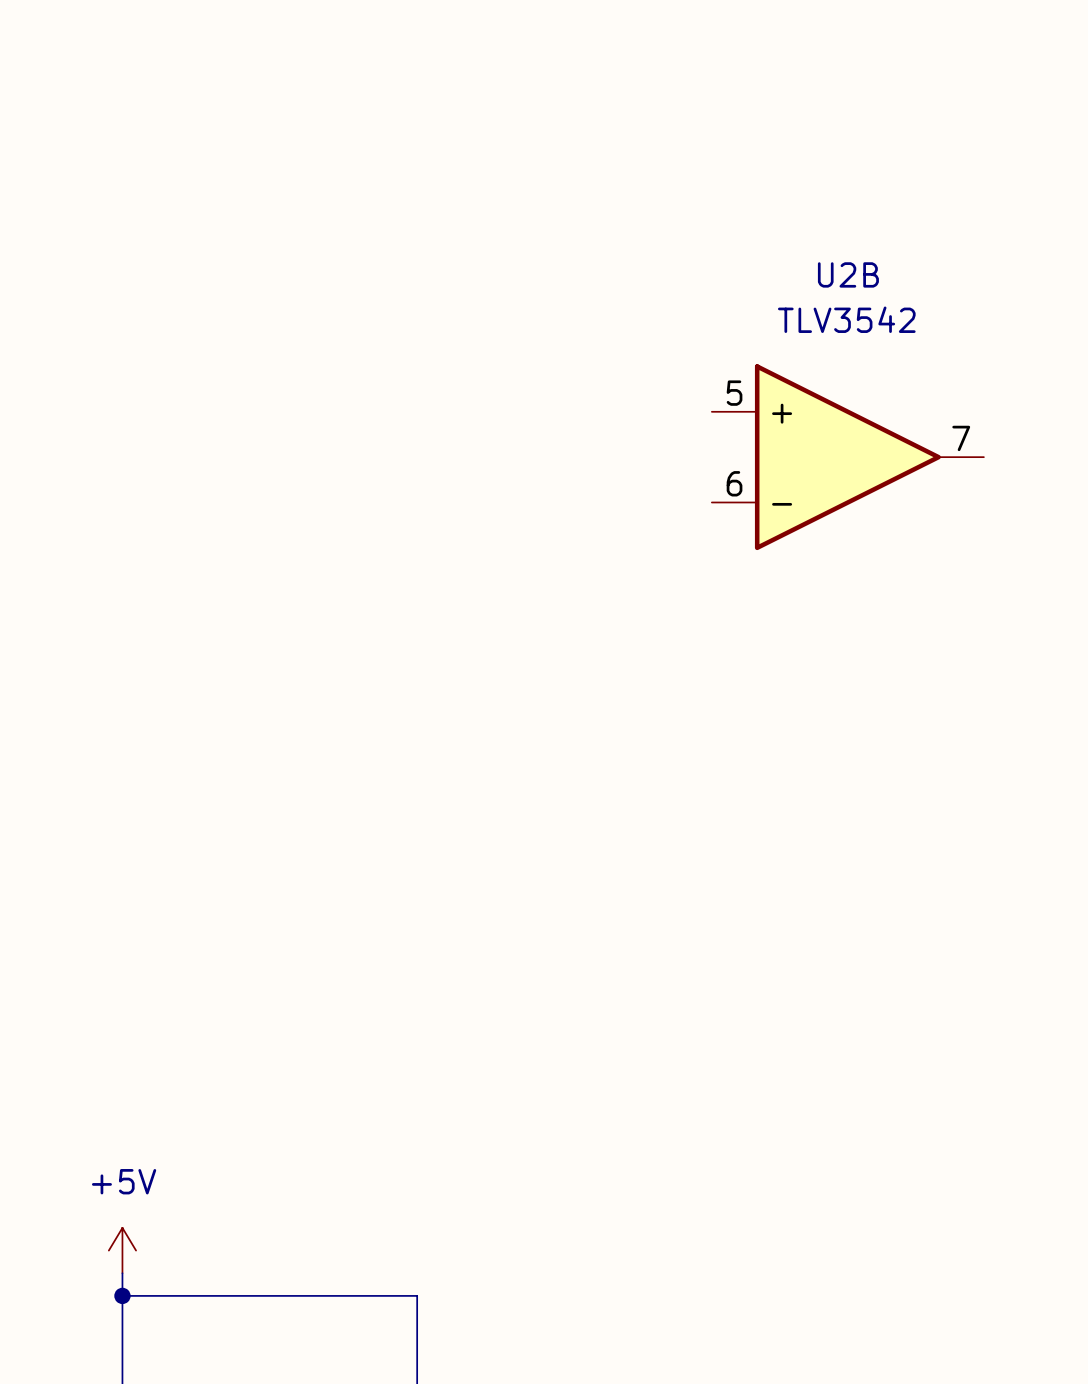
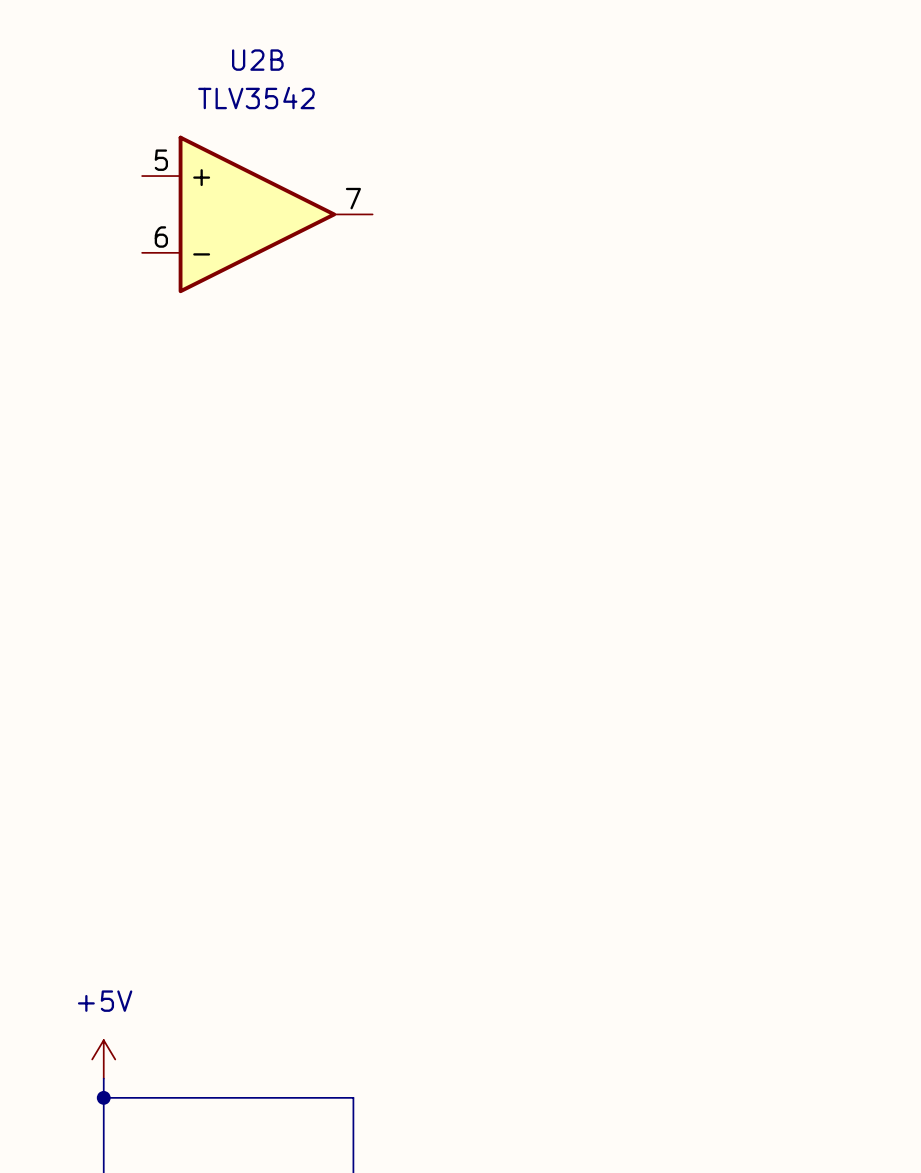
U2B position: (847, 457) -> (257, 214)

